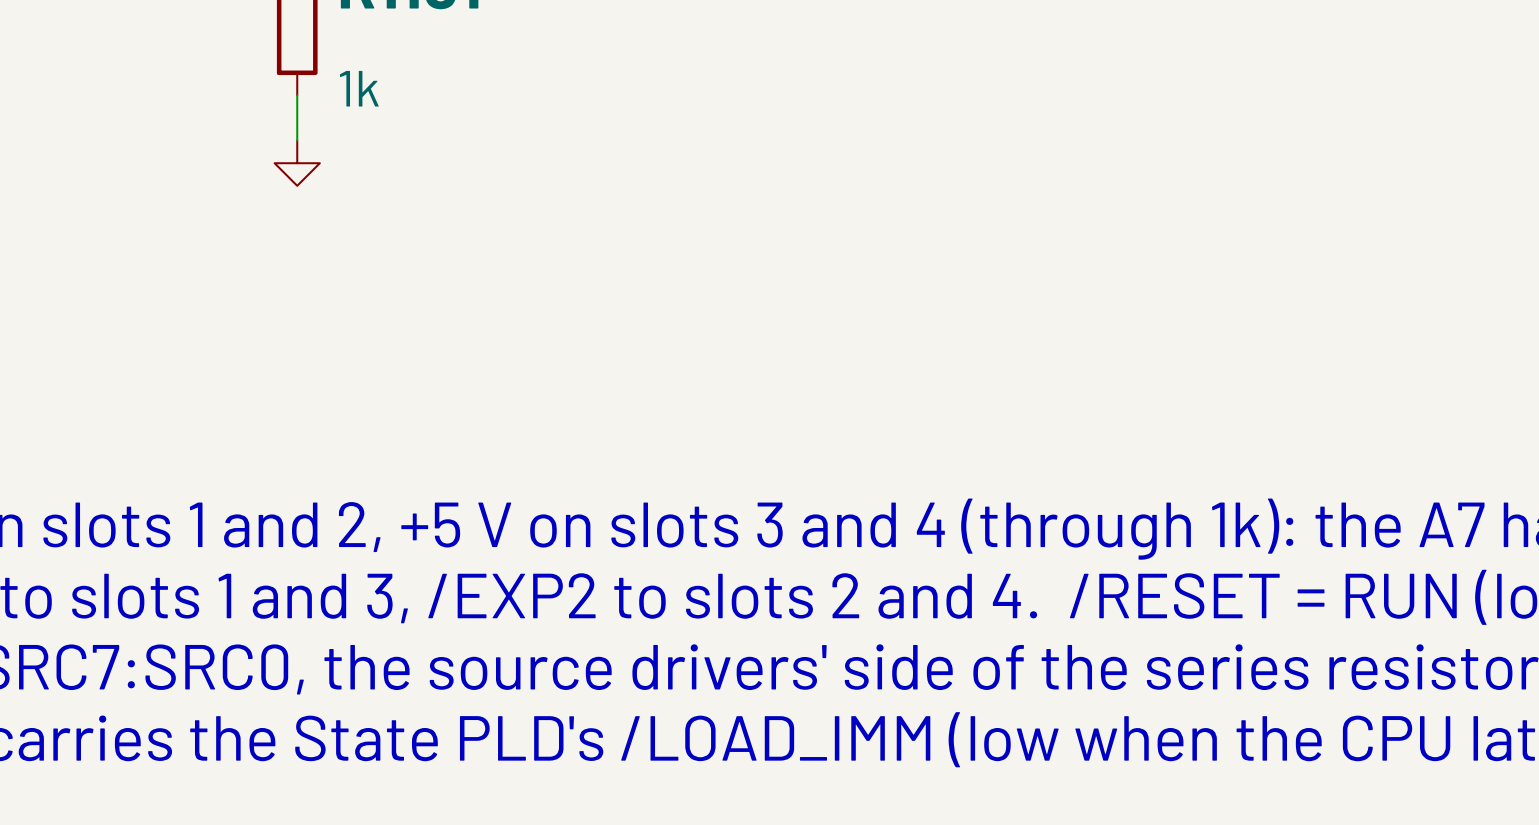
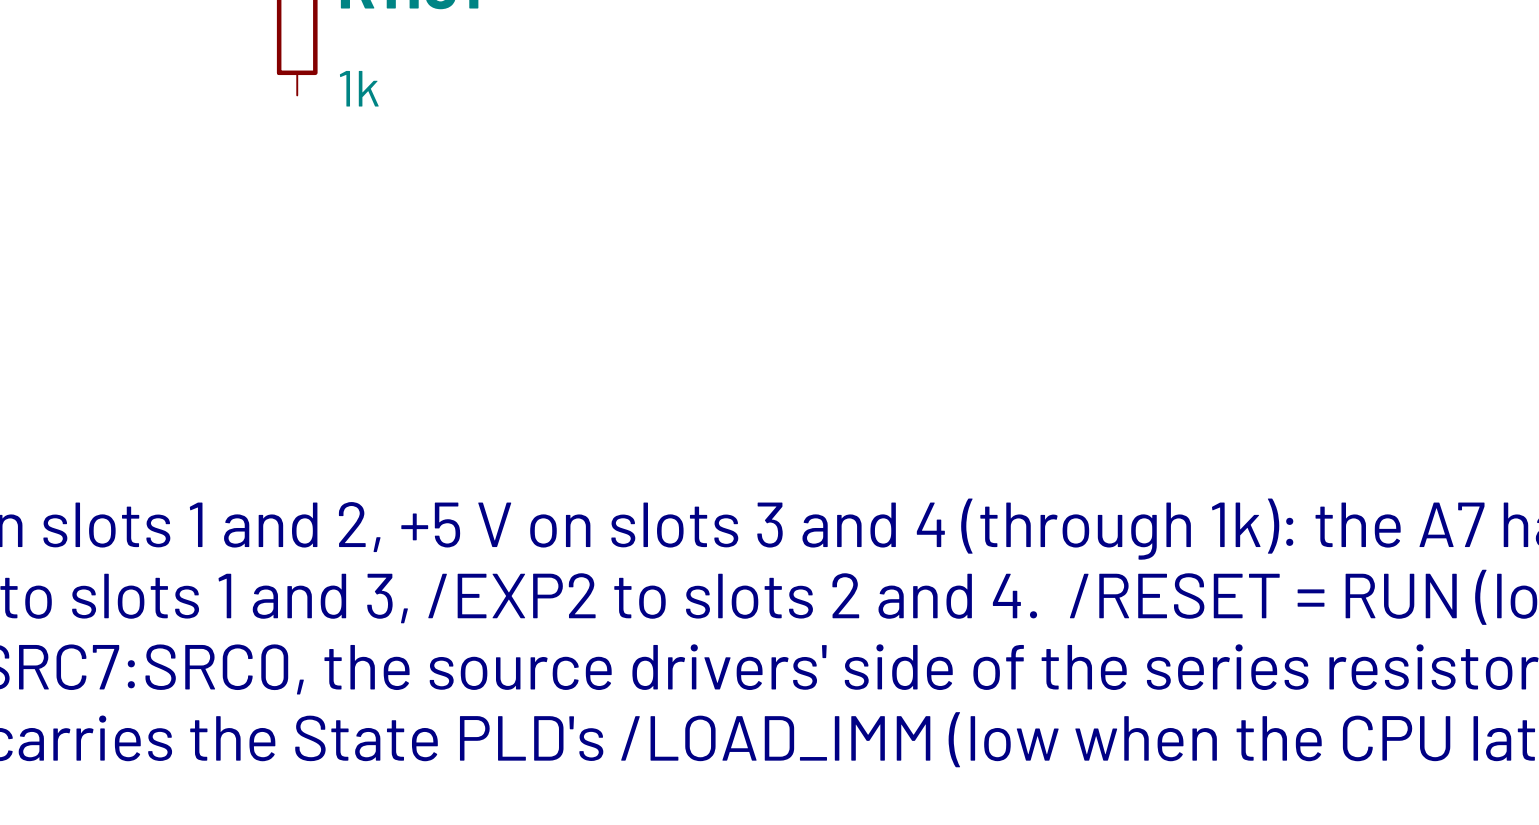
wire: (297, 95) (297, 140) -> none
power symbol: (297, 163) -> none

